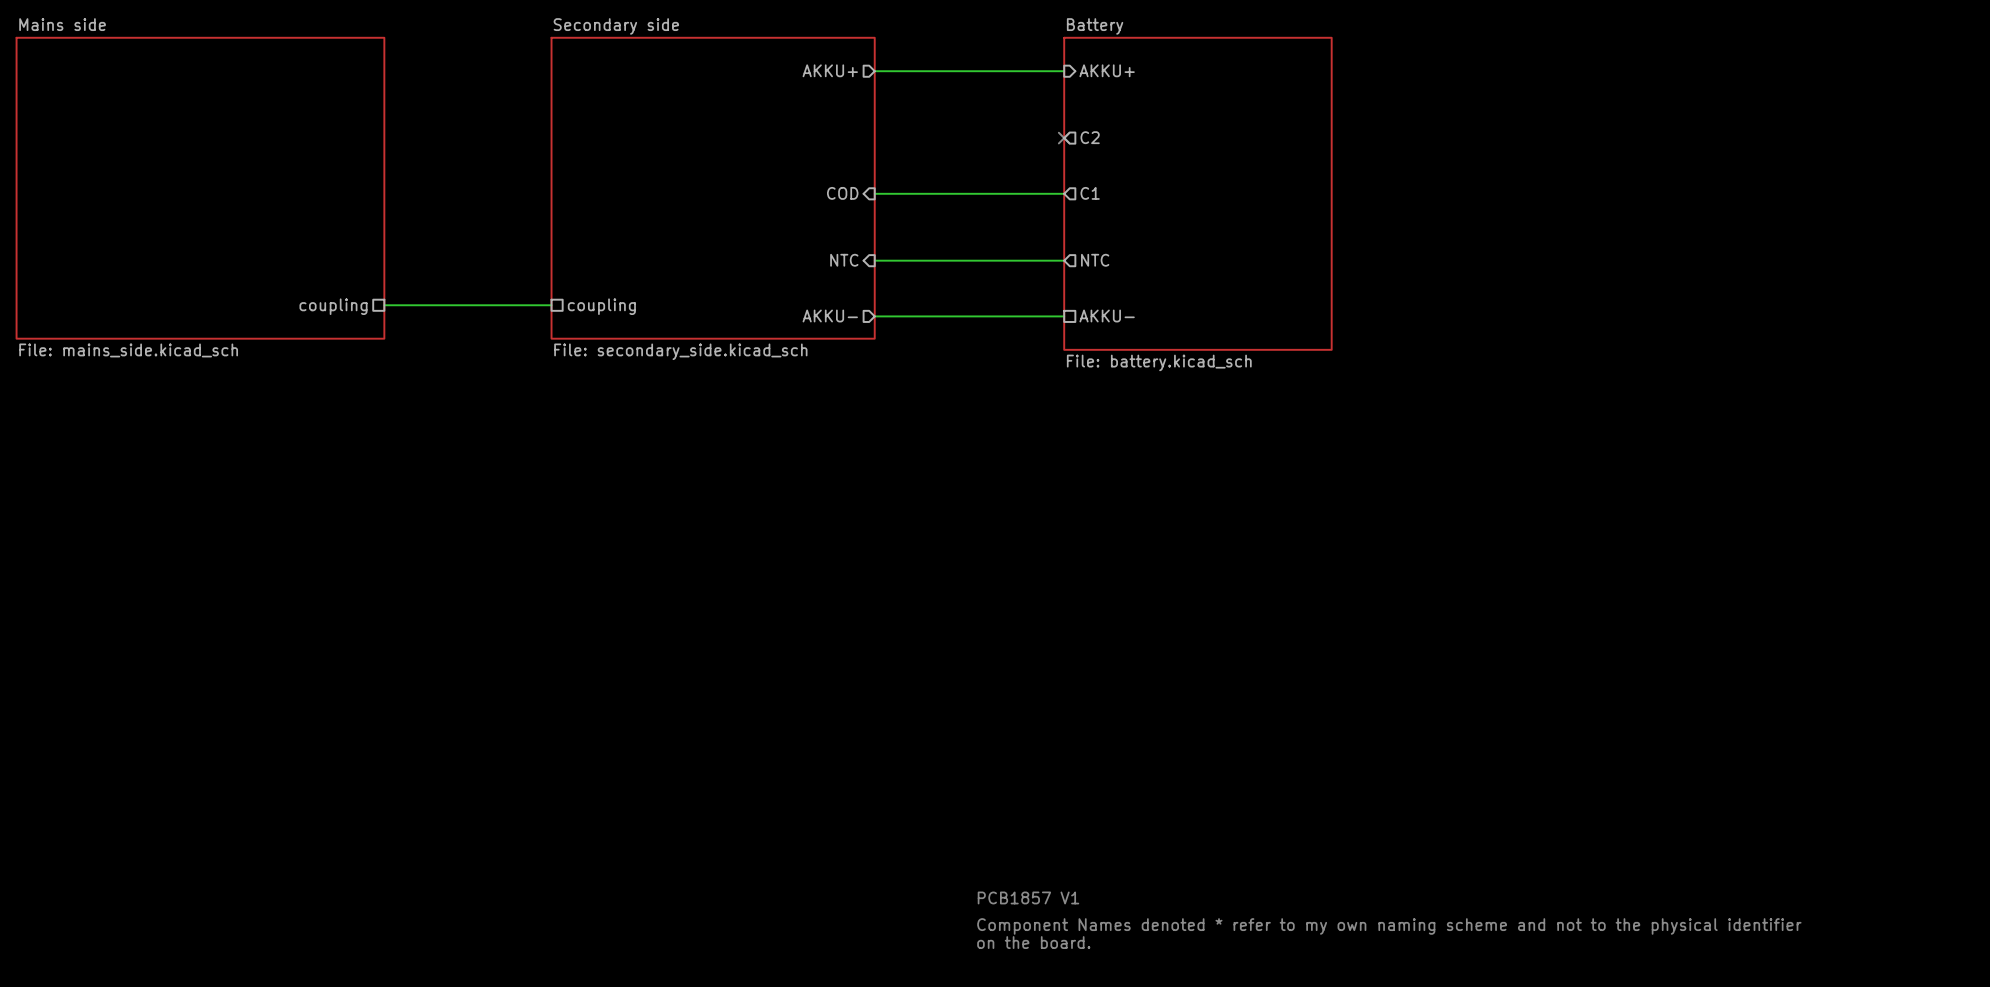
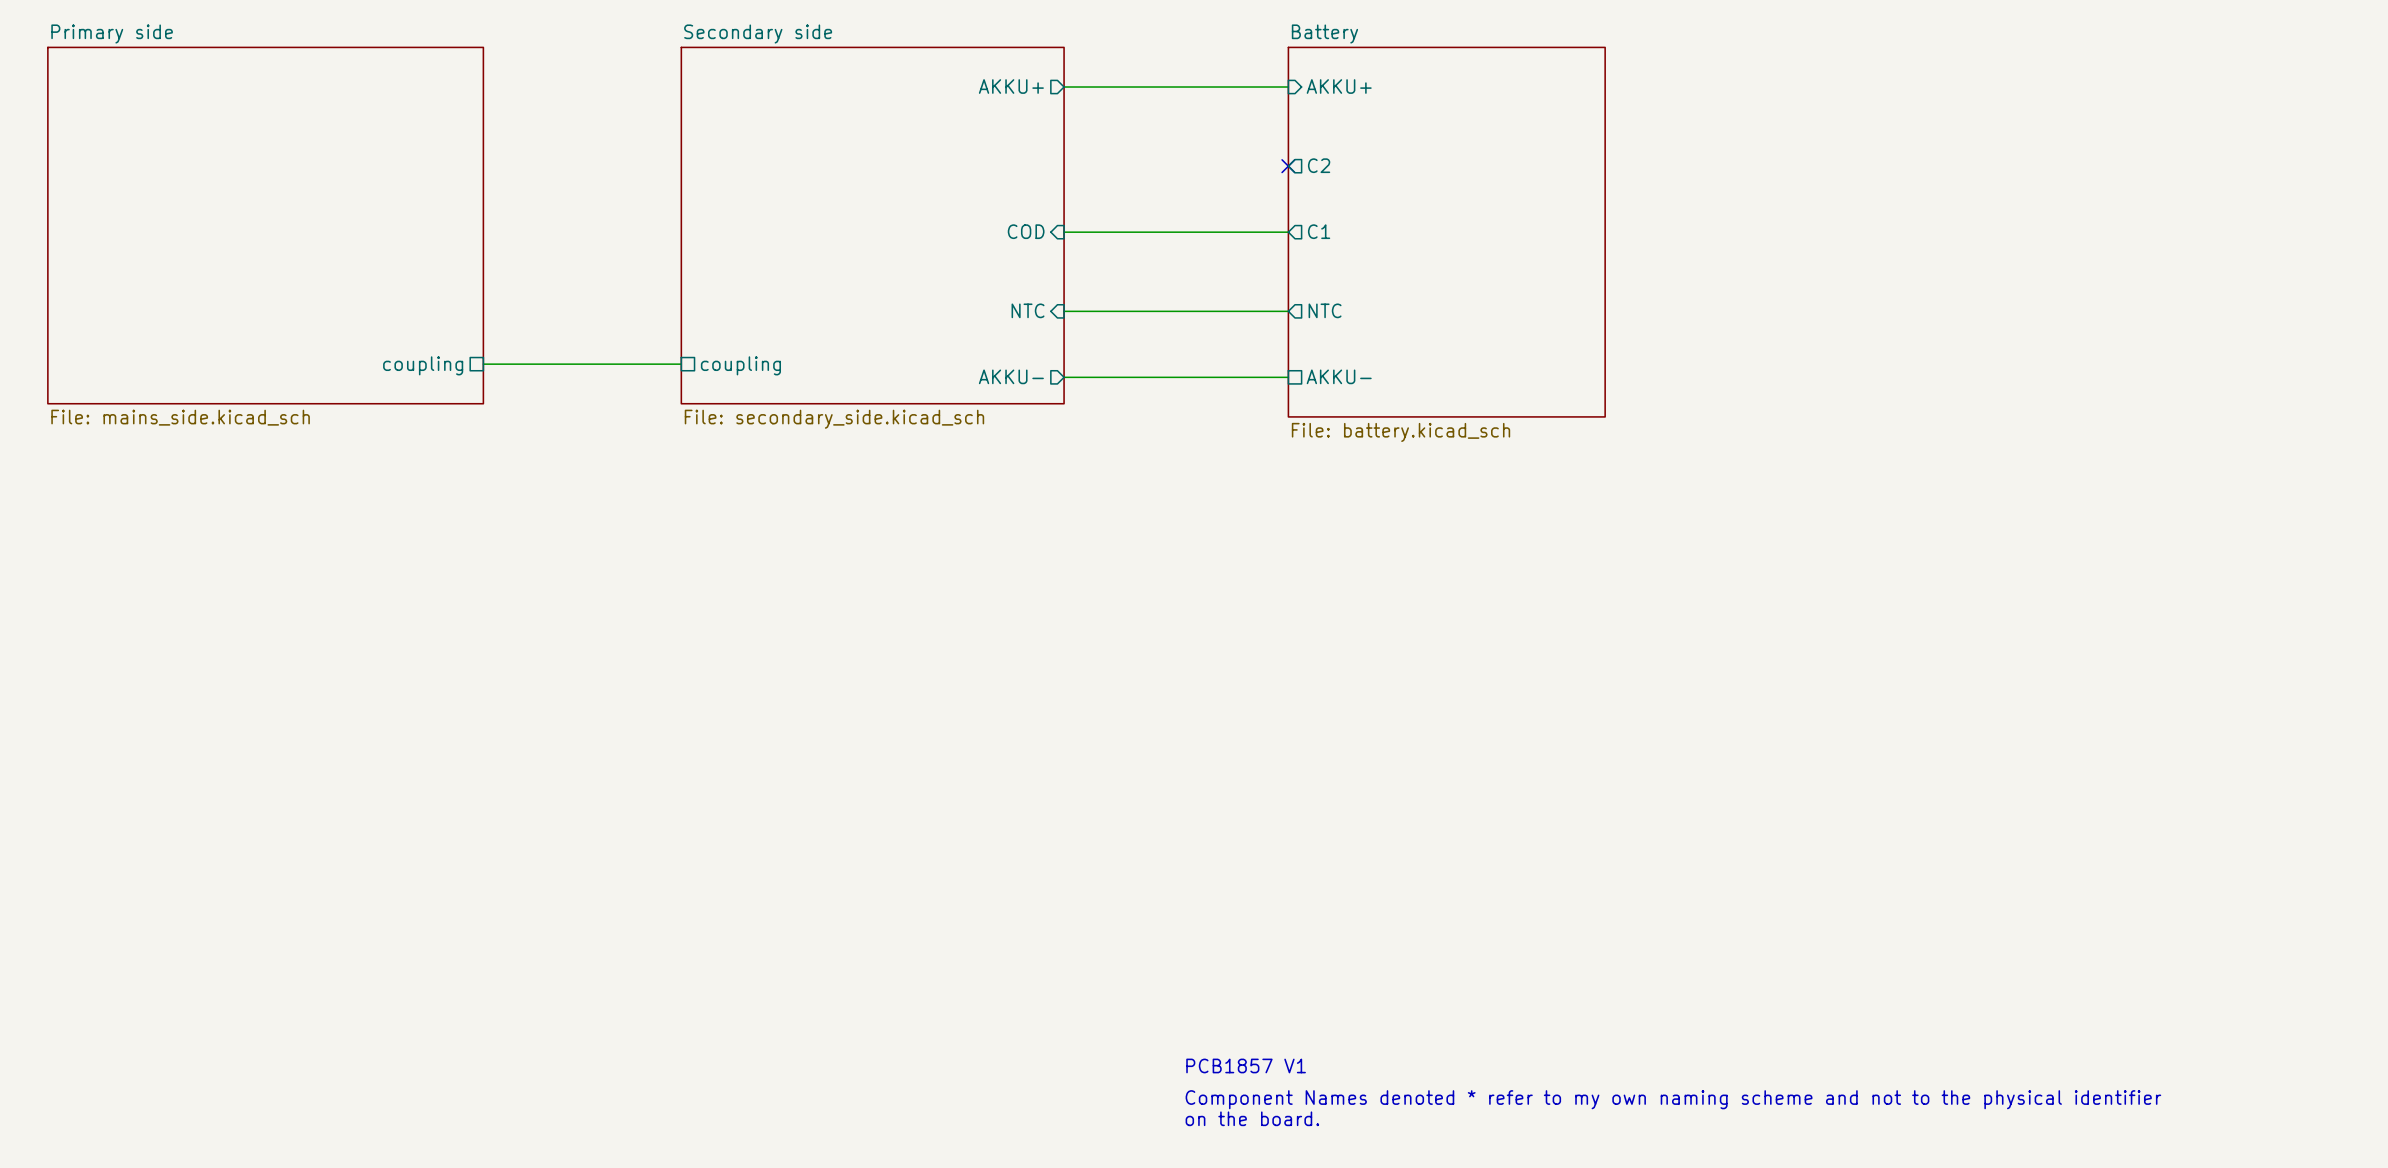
sheet Mains side name: Mains side (62, 24) -> Primary side (112, 34)

